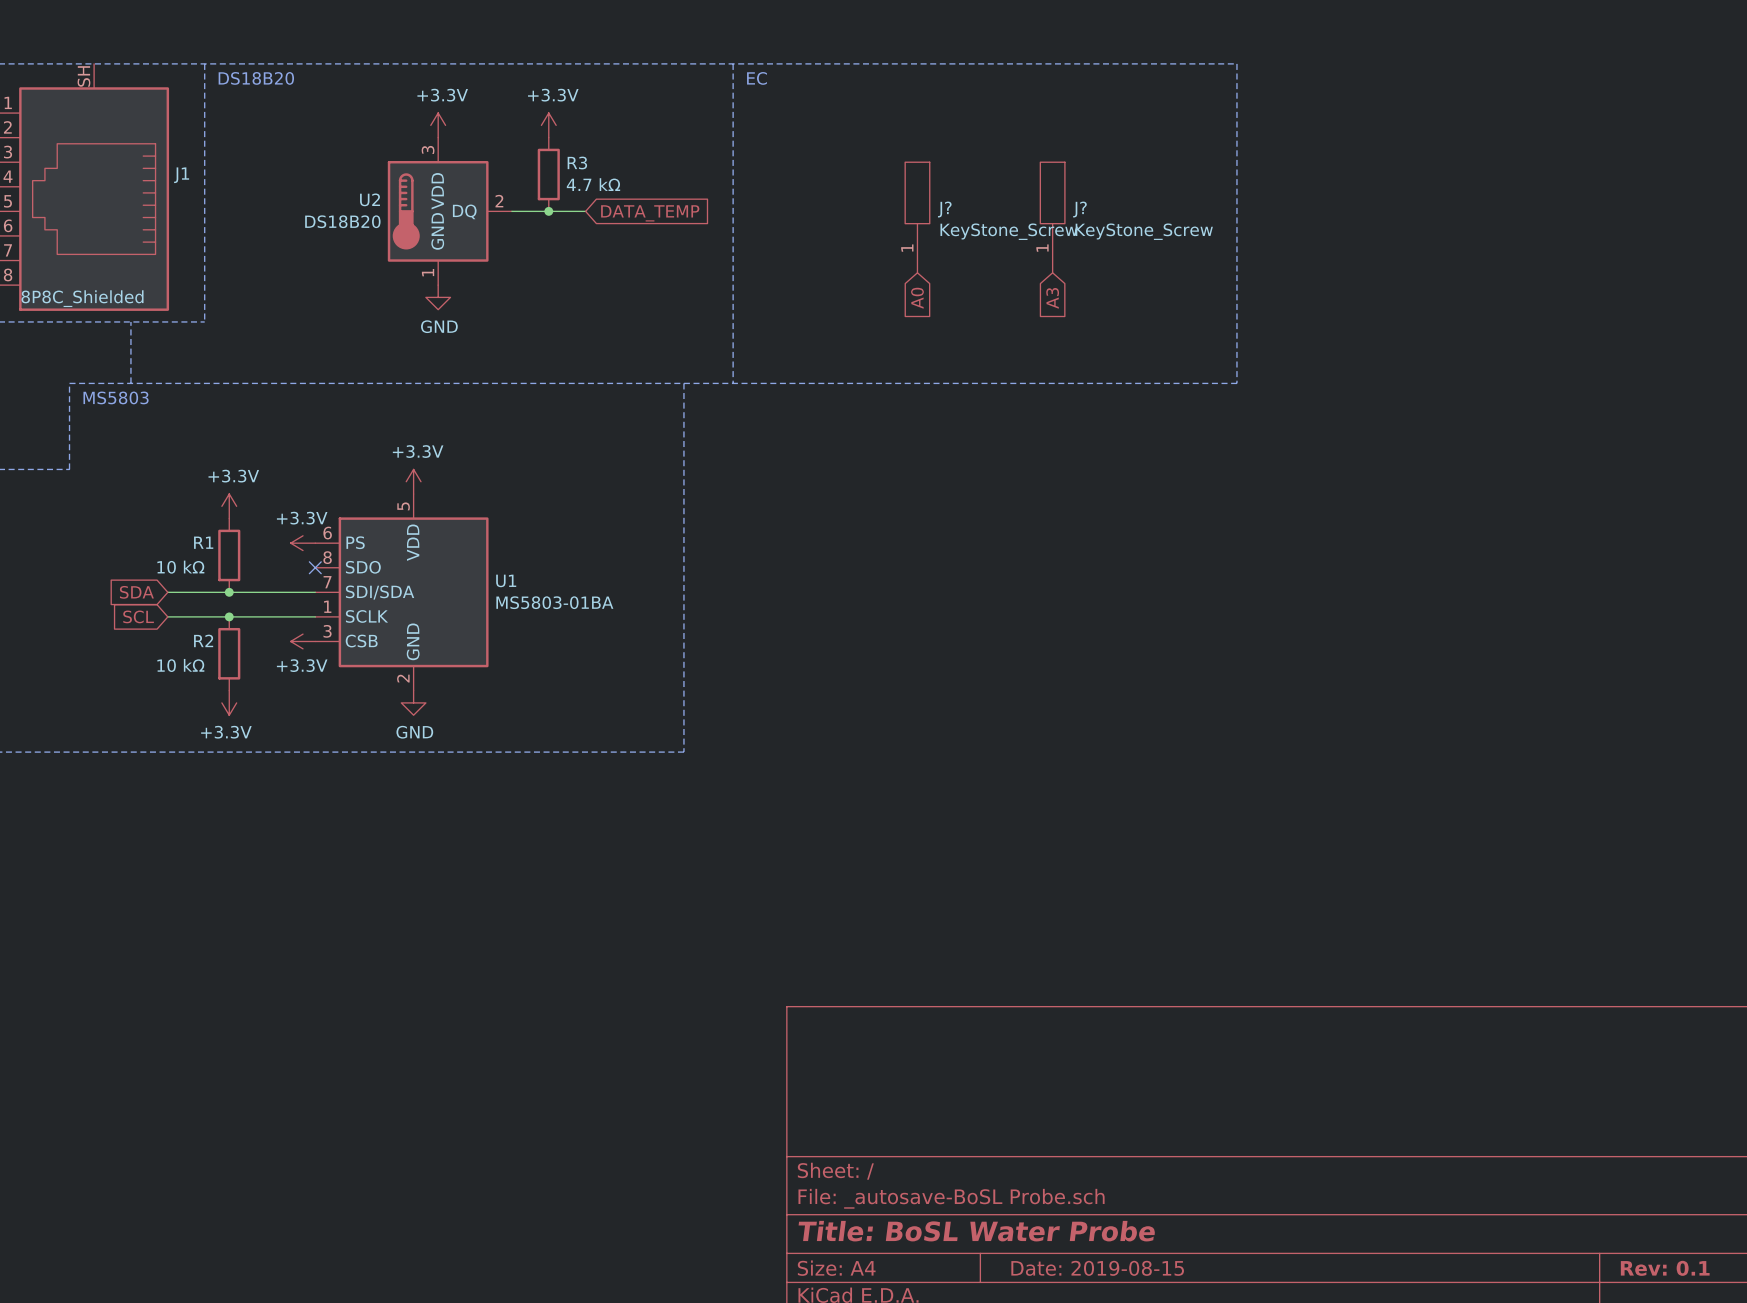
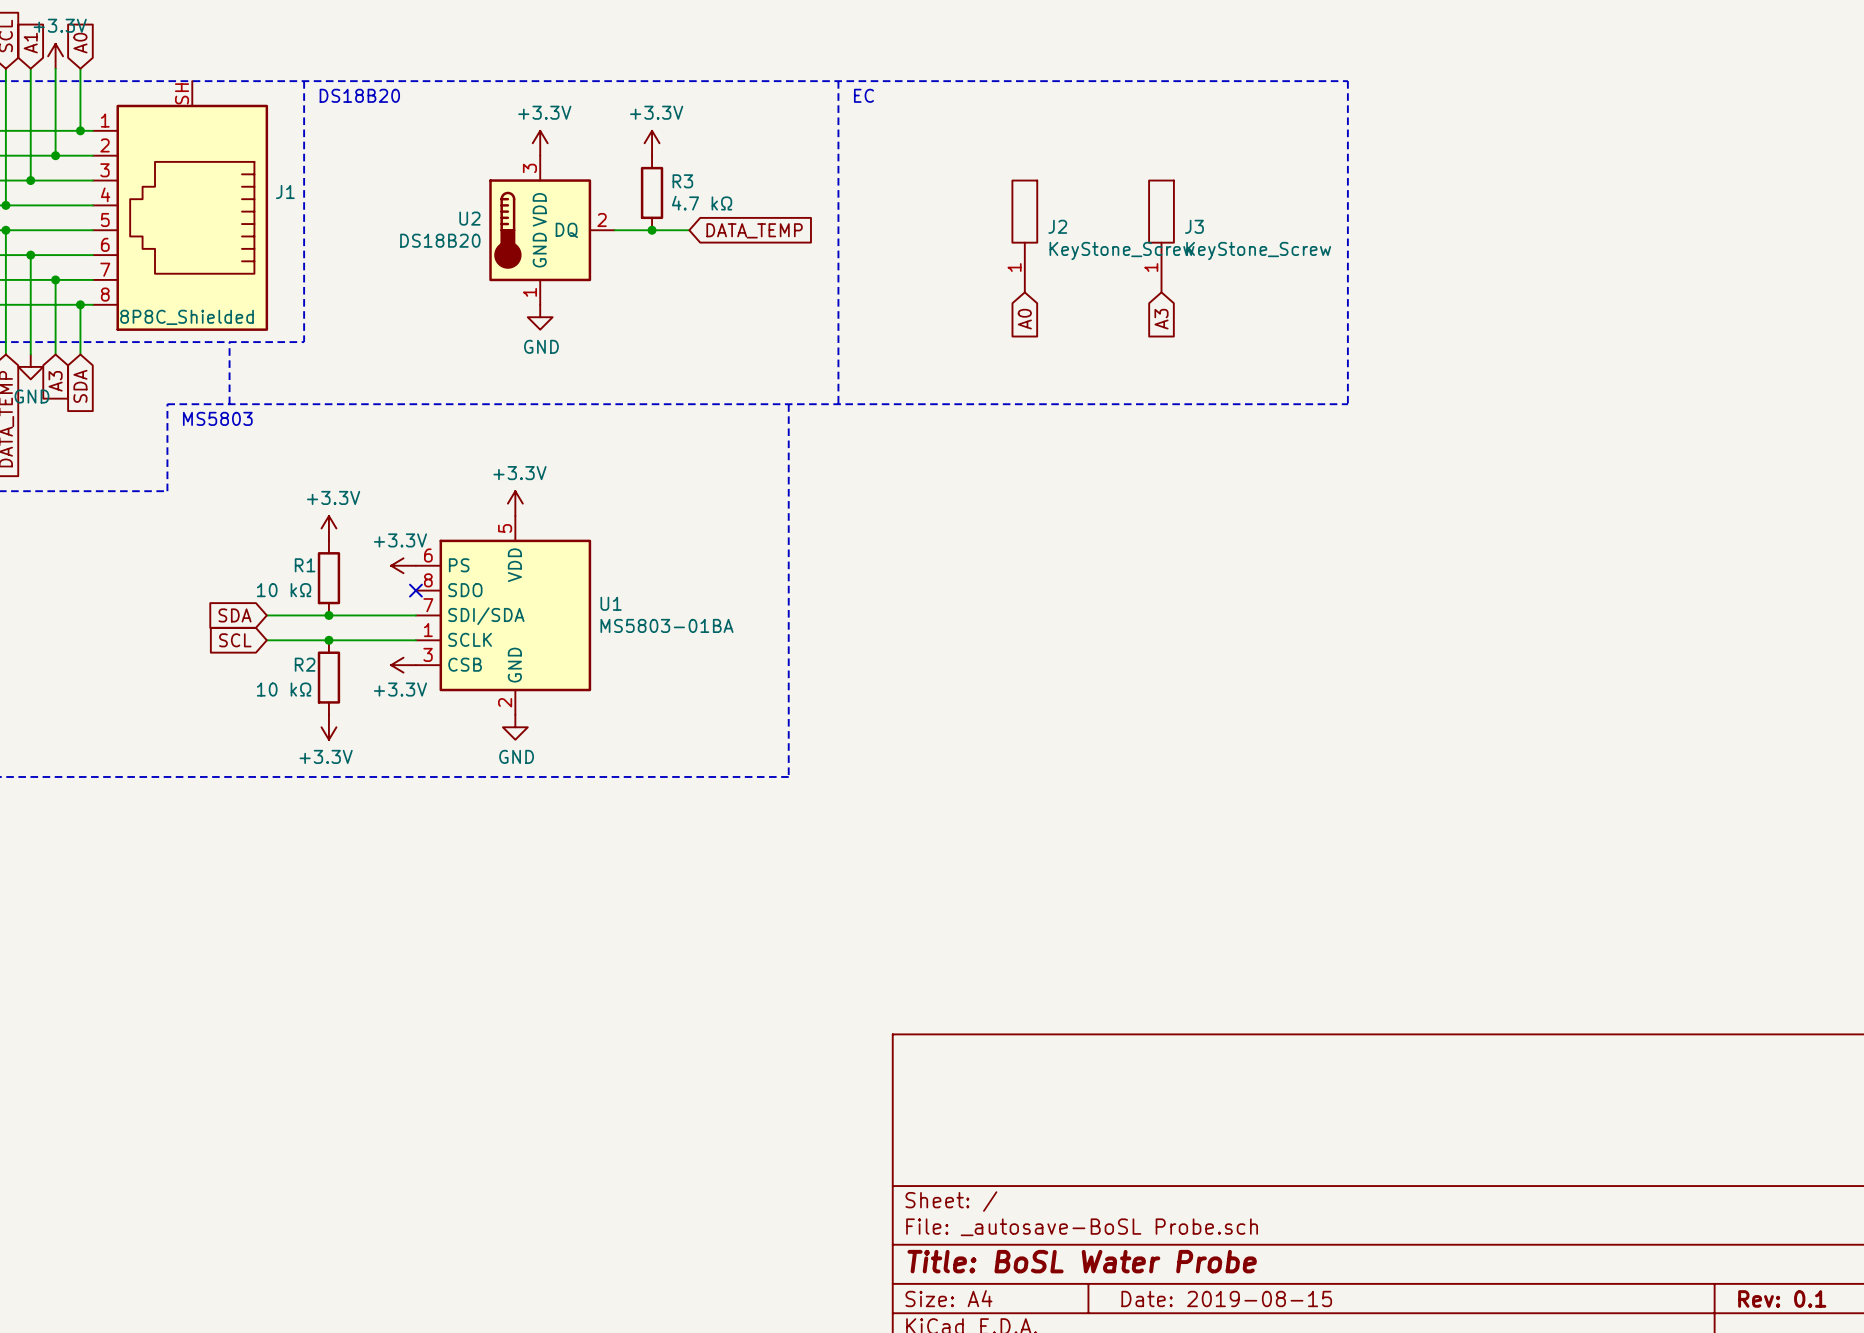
J? name: J? (944, 209) -> J2 (1057, 226)
J? name: J? (1079, 209) -> J3 (1194, 226)

